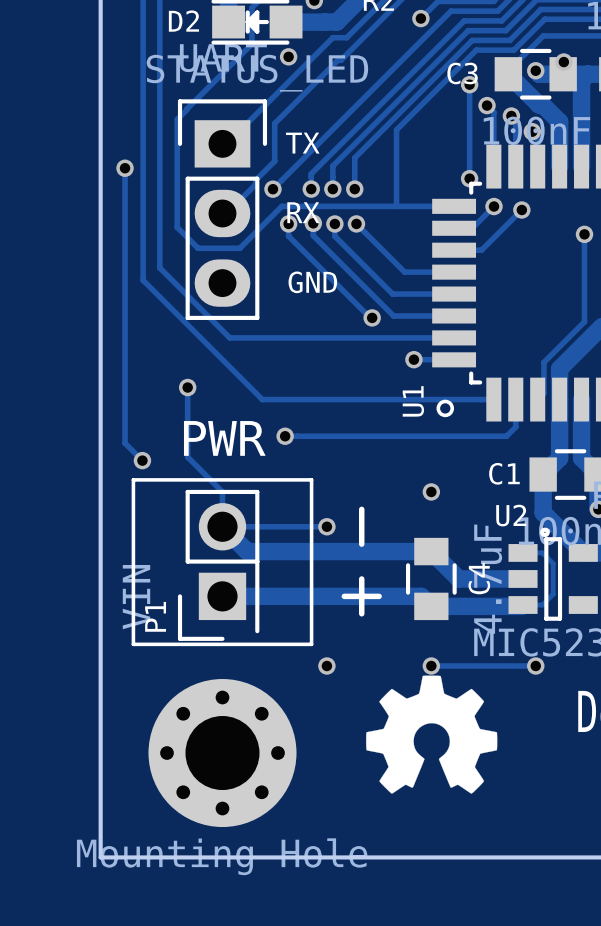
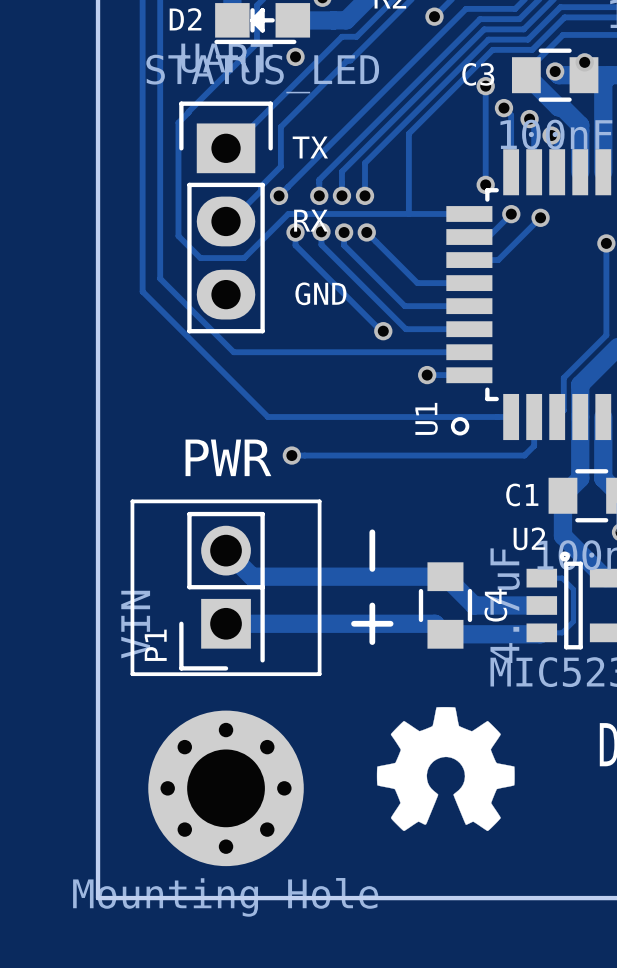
track: (125, 168) (125, 443) (142, 460) -> none
via: (125, 168) -> none
track: (187, 387) (187, 457) (222, 491) (222, 526) (326, 526) -> none
via: (187, 387) -> none
via: (142, 460) -> none
via: (431, 491) -> none
via: (326, 526) -> none
via: (326, 665) -> none
track: (431, 665) (535, 665) -> none
via: (431, 665) -> none
via: (535, 665) -> none

